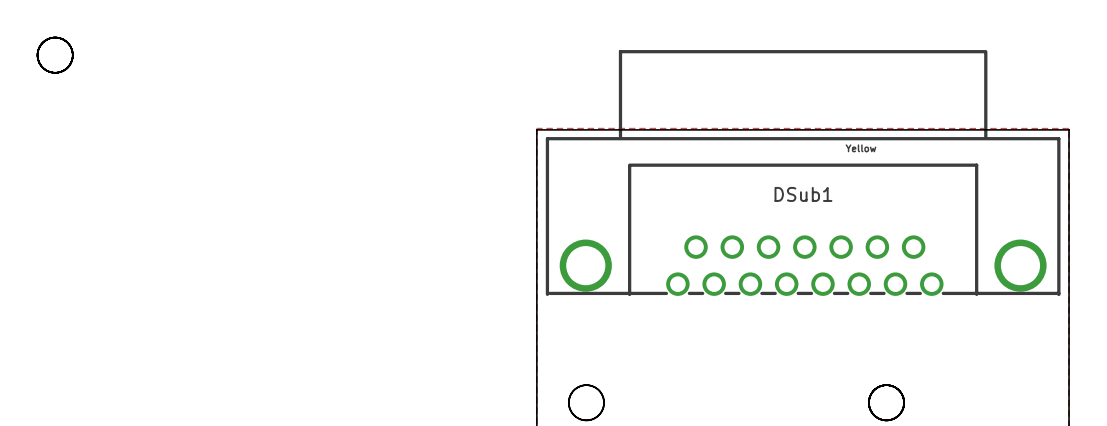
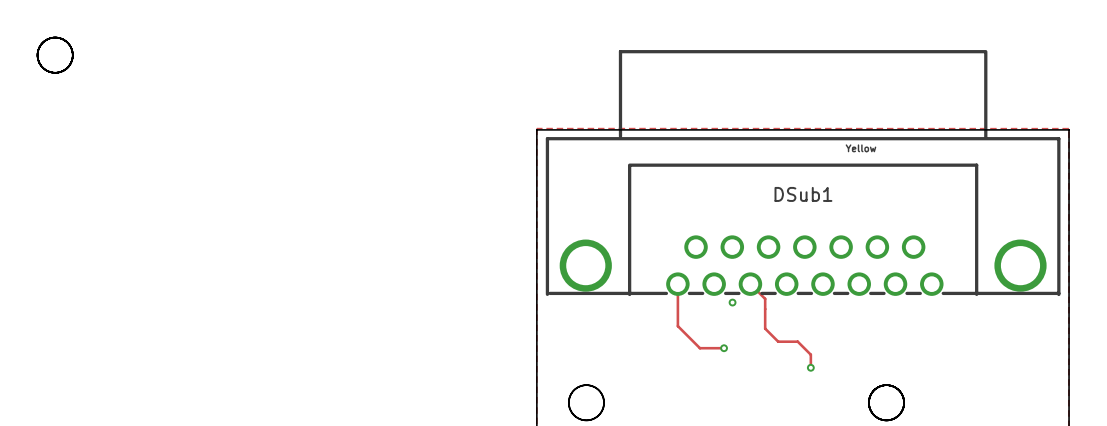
track: none -> (677, 284) (677, 326) (699, 348) (724, 348)
track: none -> (750, 284) (765, 298) (765, 328) (778, 341) (797, 341) (810, 354) (810, 367)
via: none -> (732, 302)
via: none -> (724, 348)
via: none -> (810, 367)

